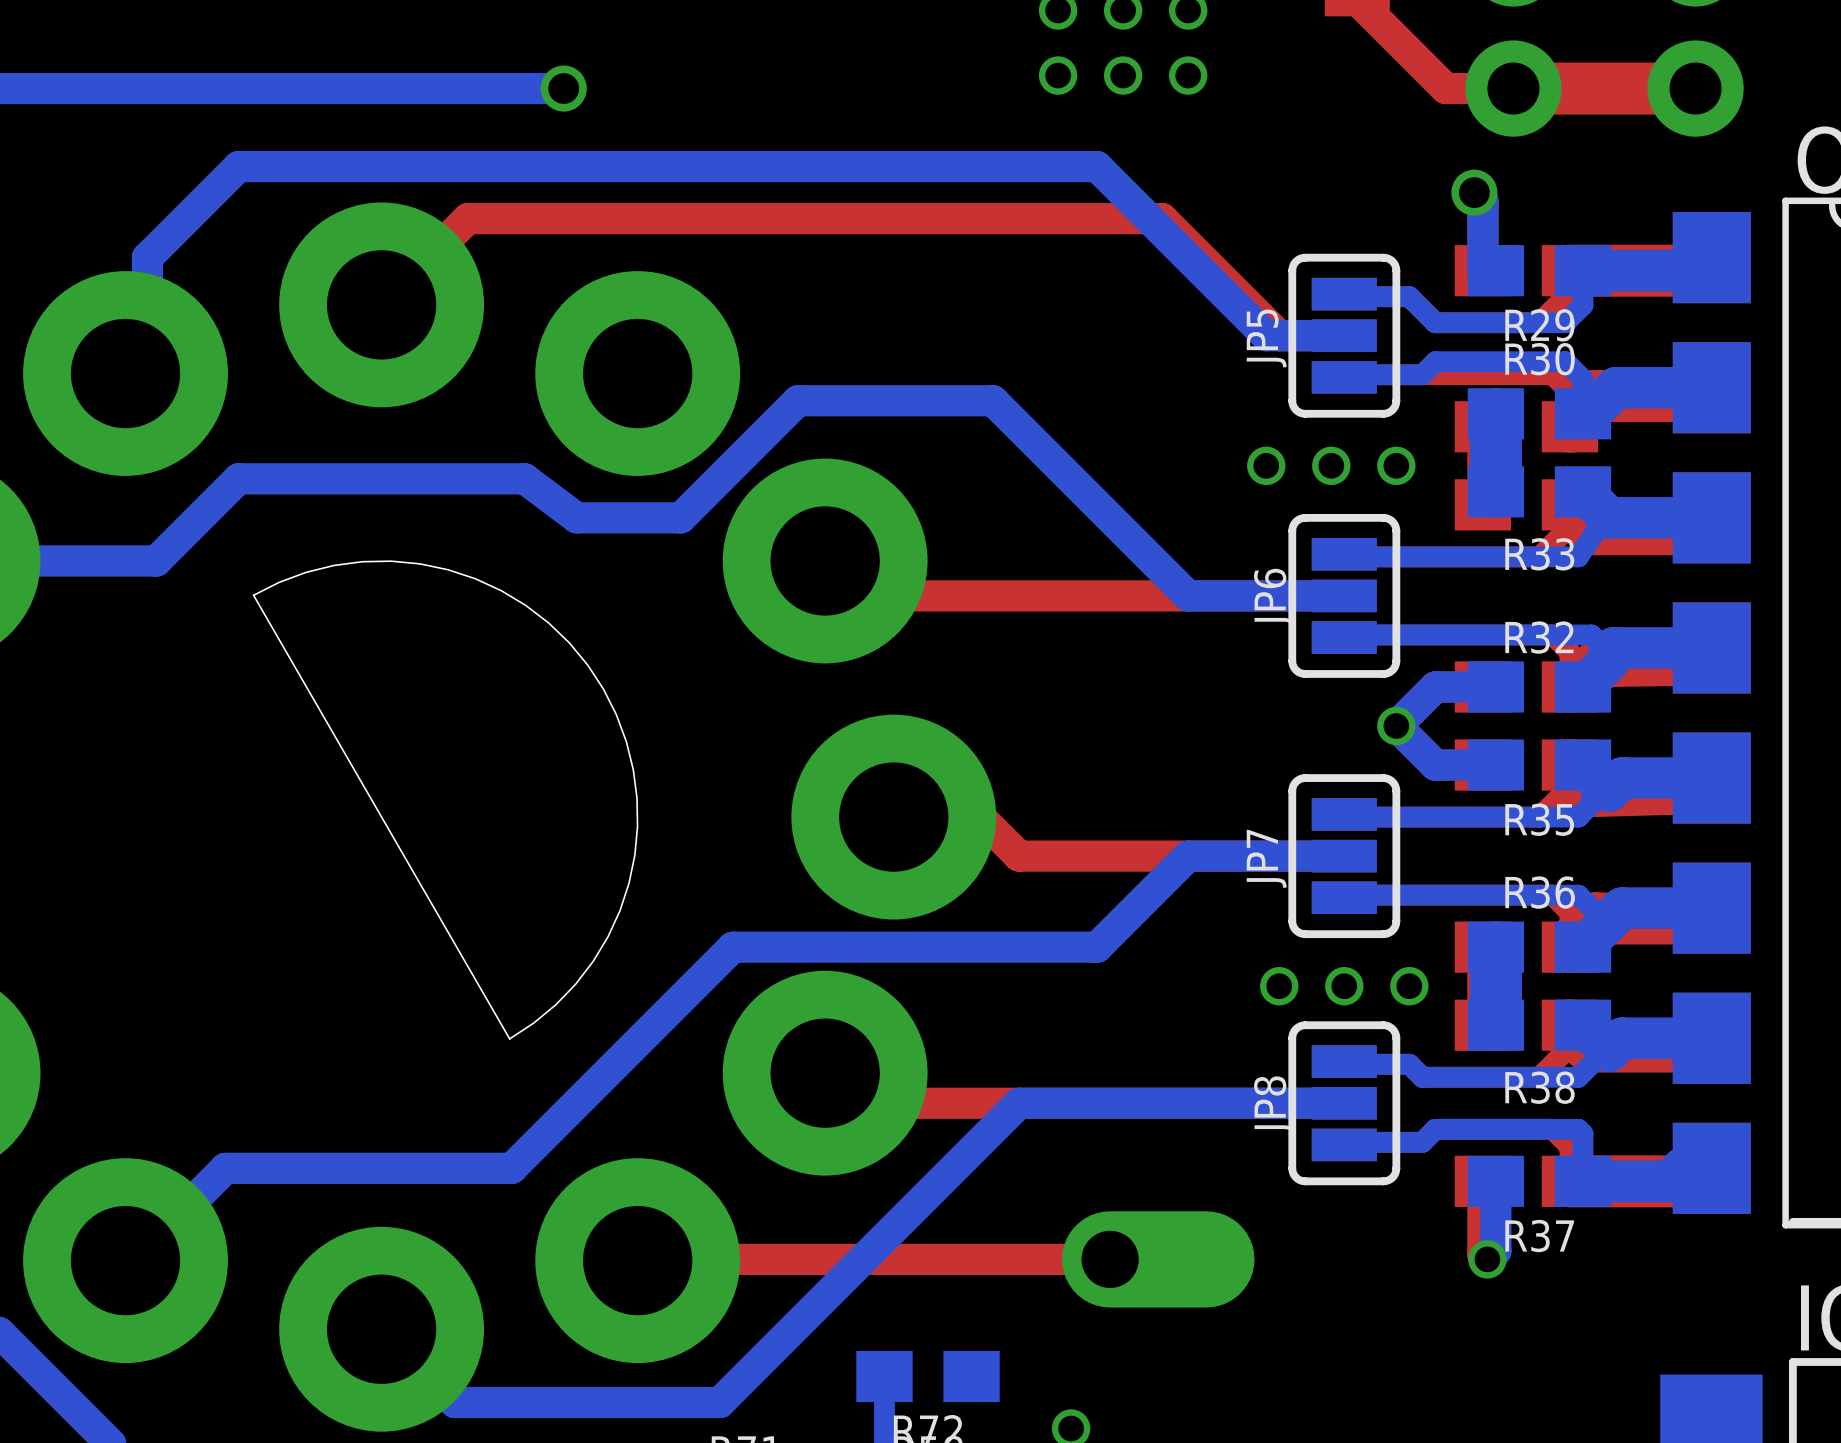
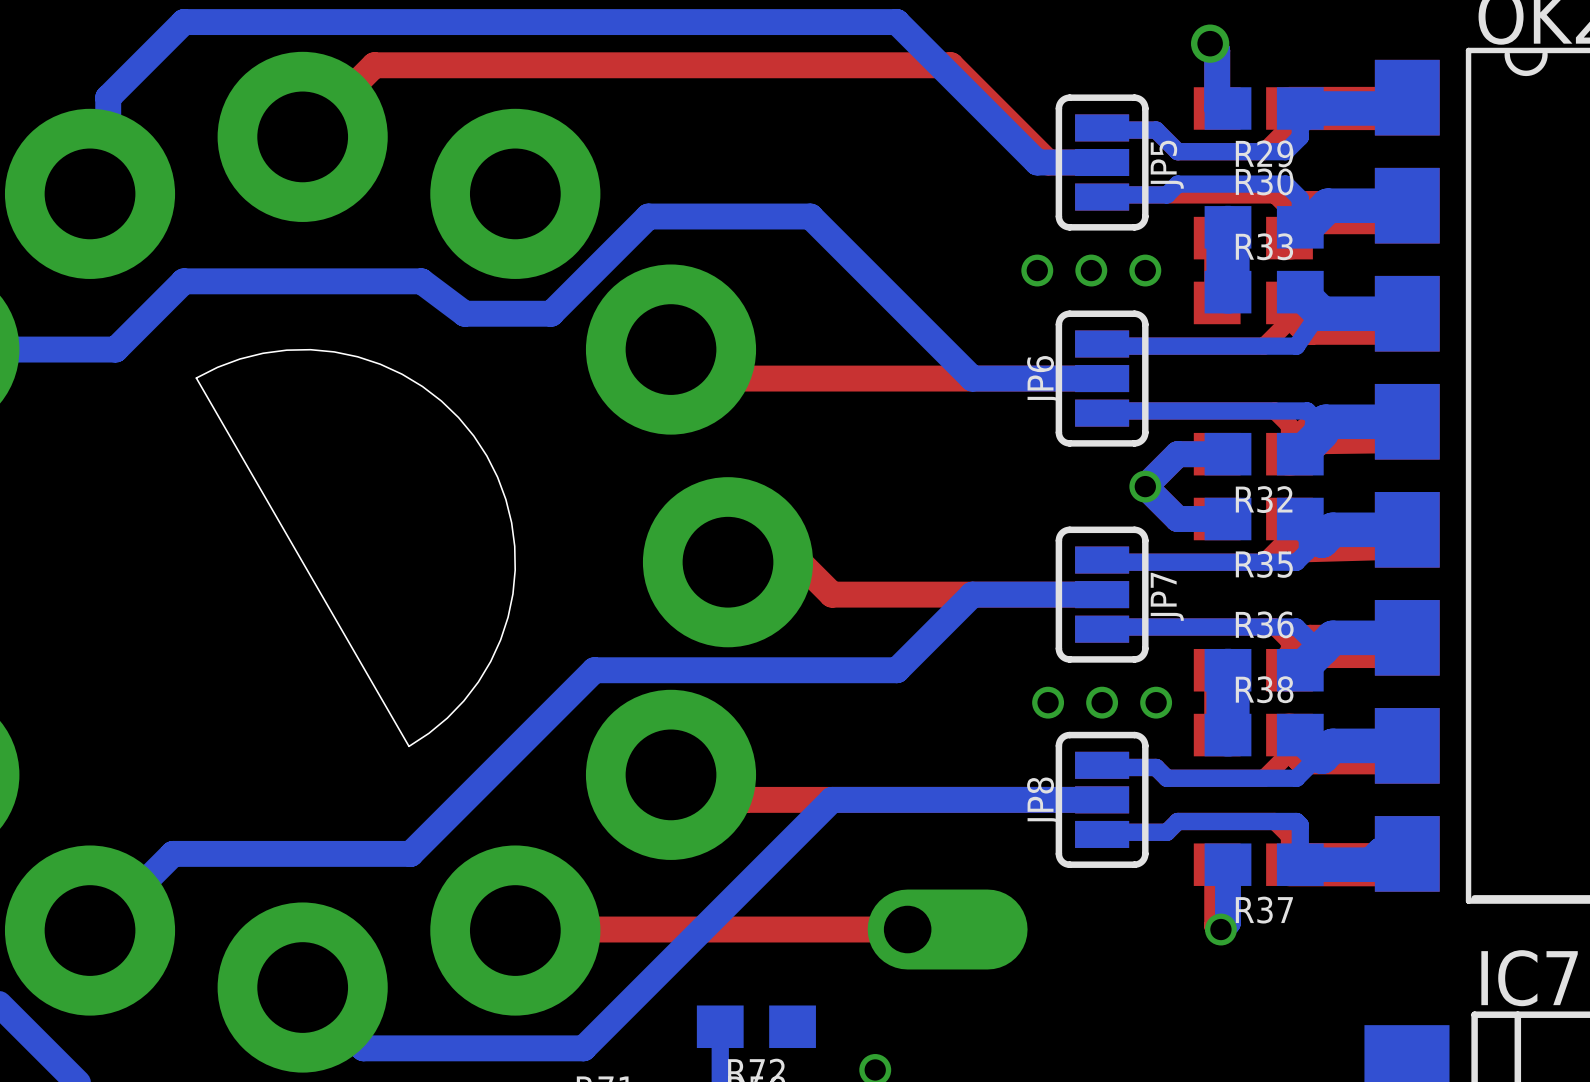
JP5 name position: JP5 (1266, 338) -> JP5 (1167, 164)
R33 name position: R33 (1539, 554) -> R33 (1264, 246)
R32 name position: R32 (1539, 637) -> R32 (1264, 499)
JP7 name position: JP7 (1266, 858) -> JP7 (1167, 596)
R38 name position: R38 (1540, 1087) -> R38 (1264, 689)

